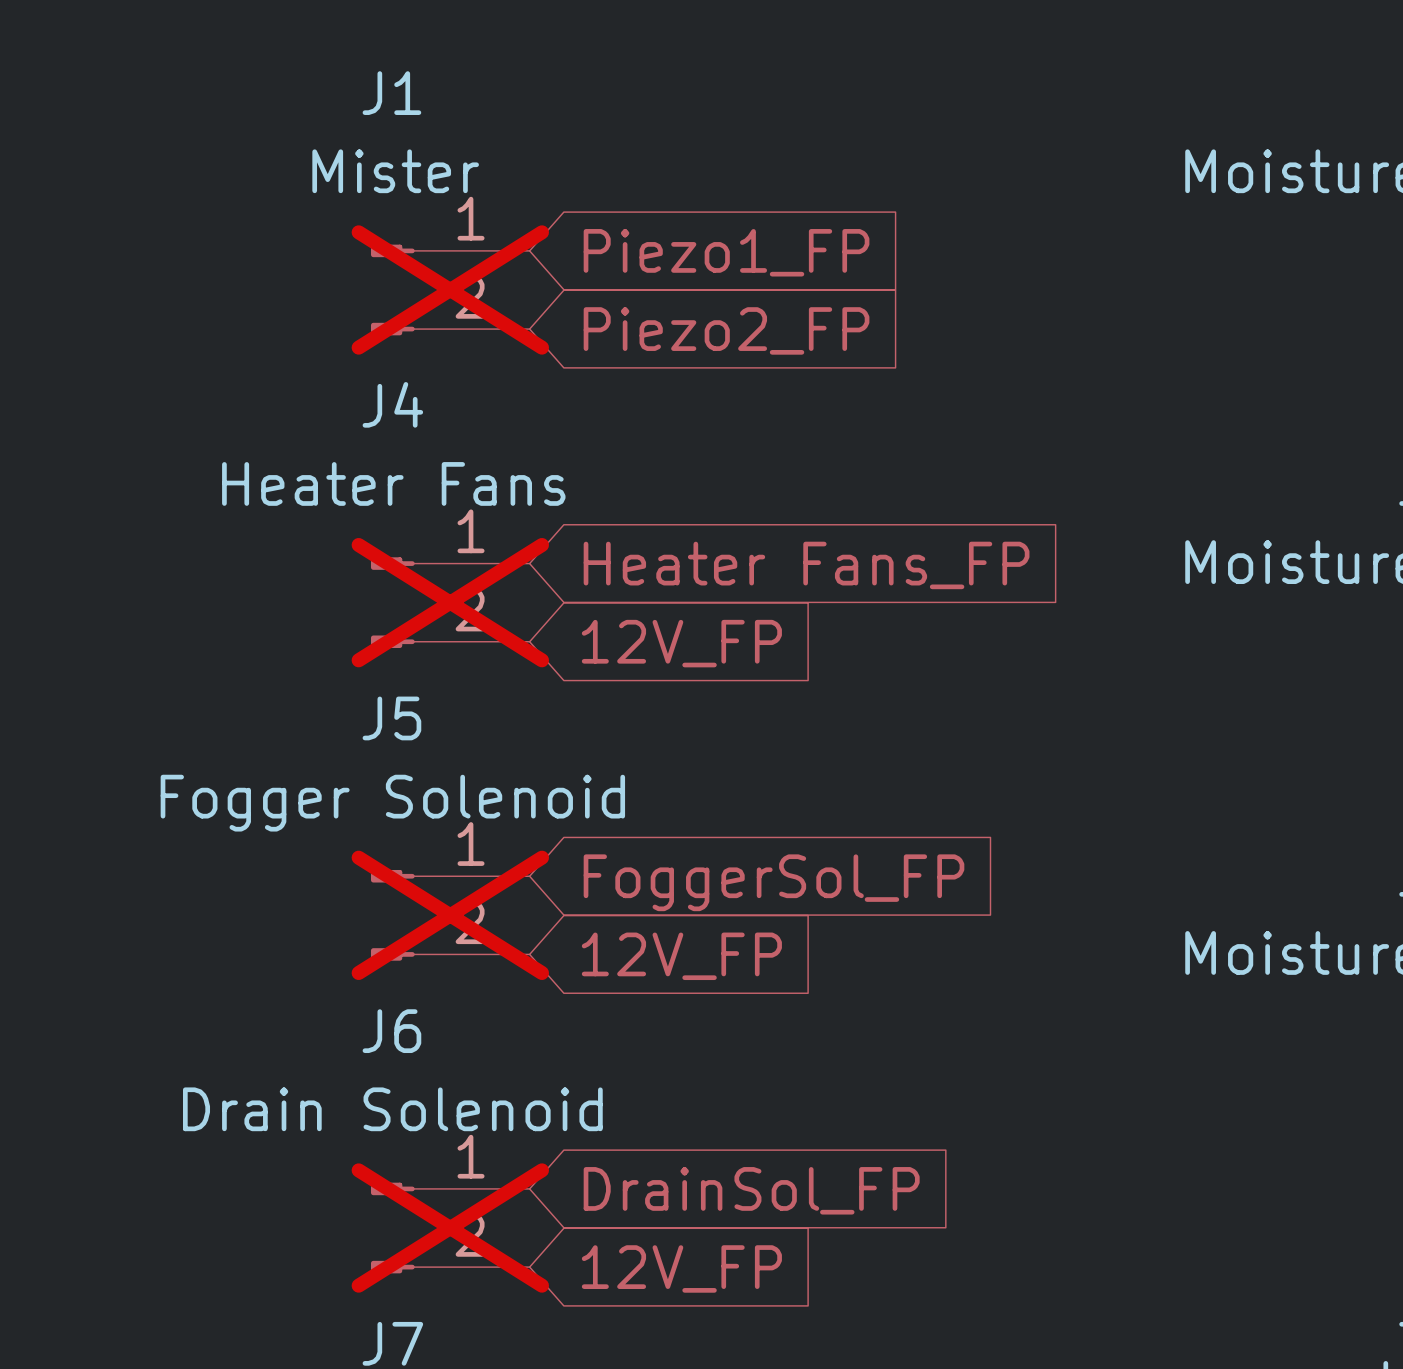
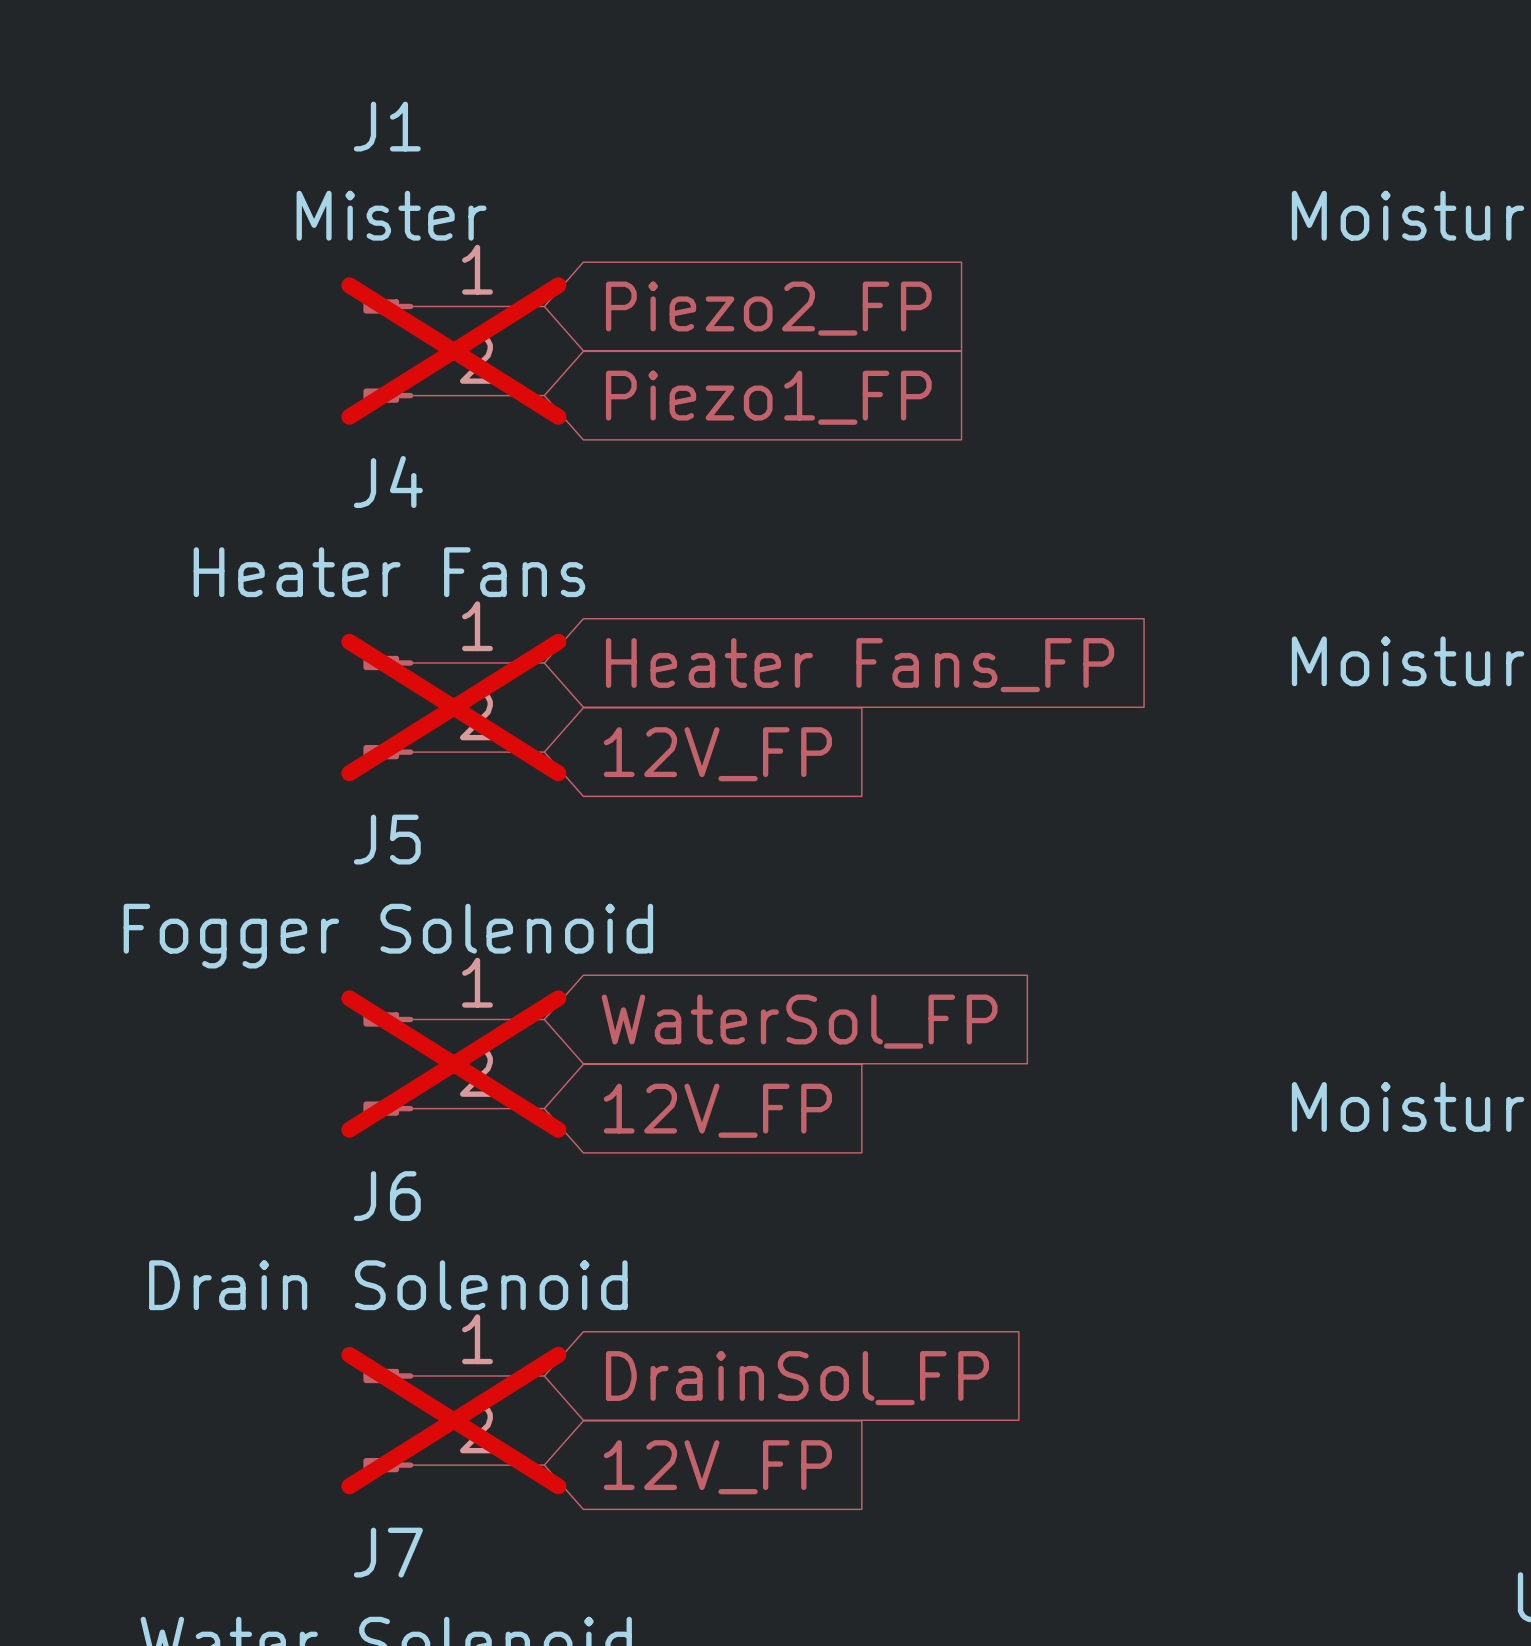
global label: Piezo1_FP (726, 252) -> Piezo2_FP (768, 308)
global label: Piezo2_FP (726, 330) -> Piezo1_FP (768, 397)
global label: FoggerSol_FP (774, 882) -> WaterSol_FP (799, 1021)

